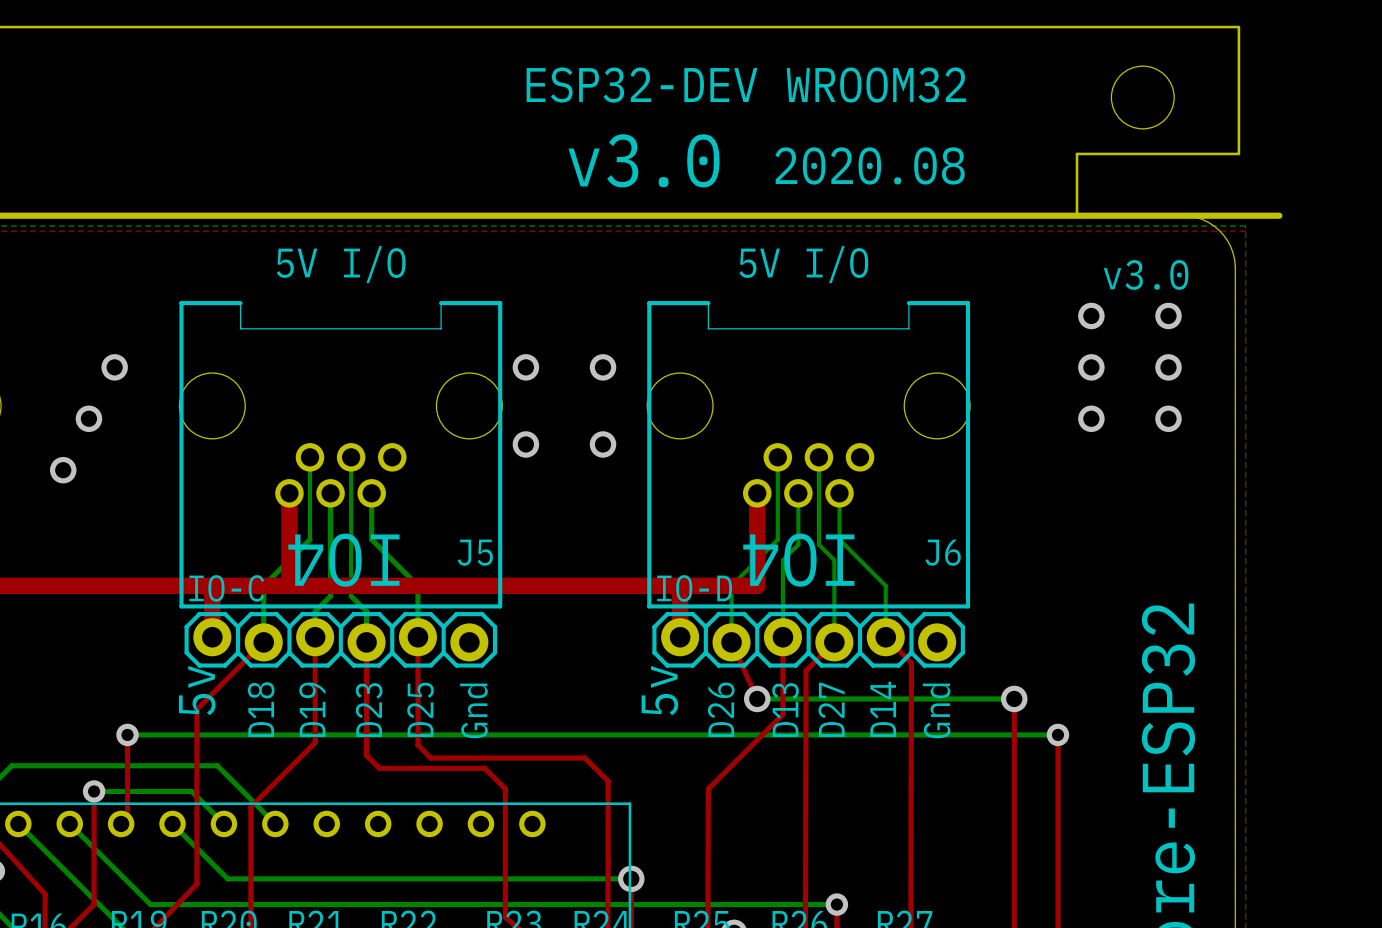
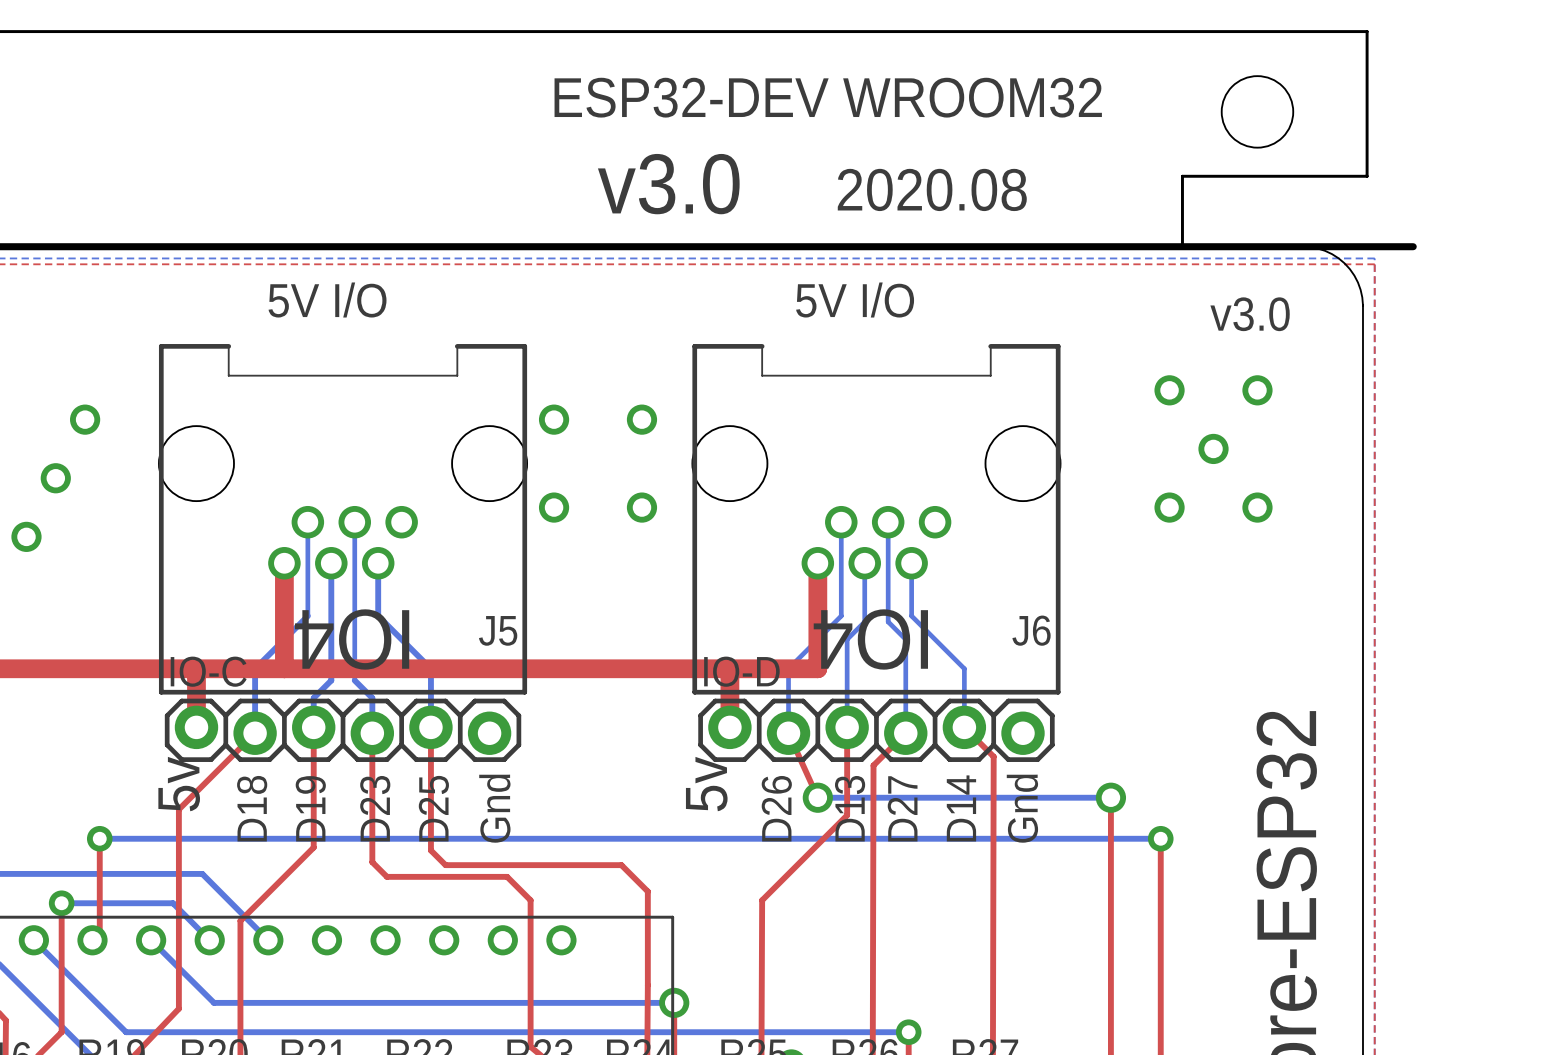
via: (1091, 315) -> none
via: (1168, 315) -> none
via: none -> (1169, 390)
via: none -> (1257, 390)
via: (1091, 367) -> none
via: (1168, 367) -> none
via: none -> (1213, 448)
via: (1091, 418) -> none
via: (1168, 418) -> none
via: none -> (1169, 507)
via: none -> (1257, 507)

